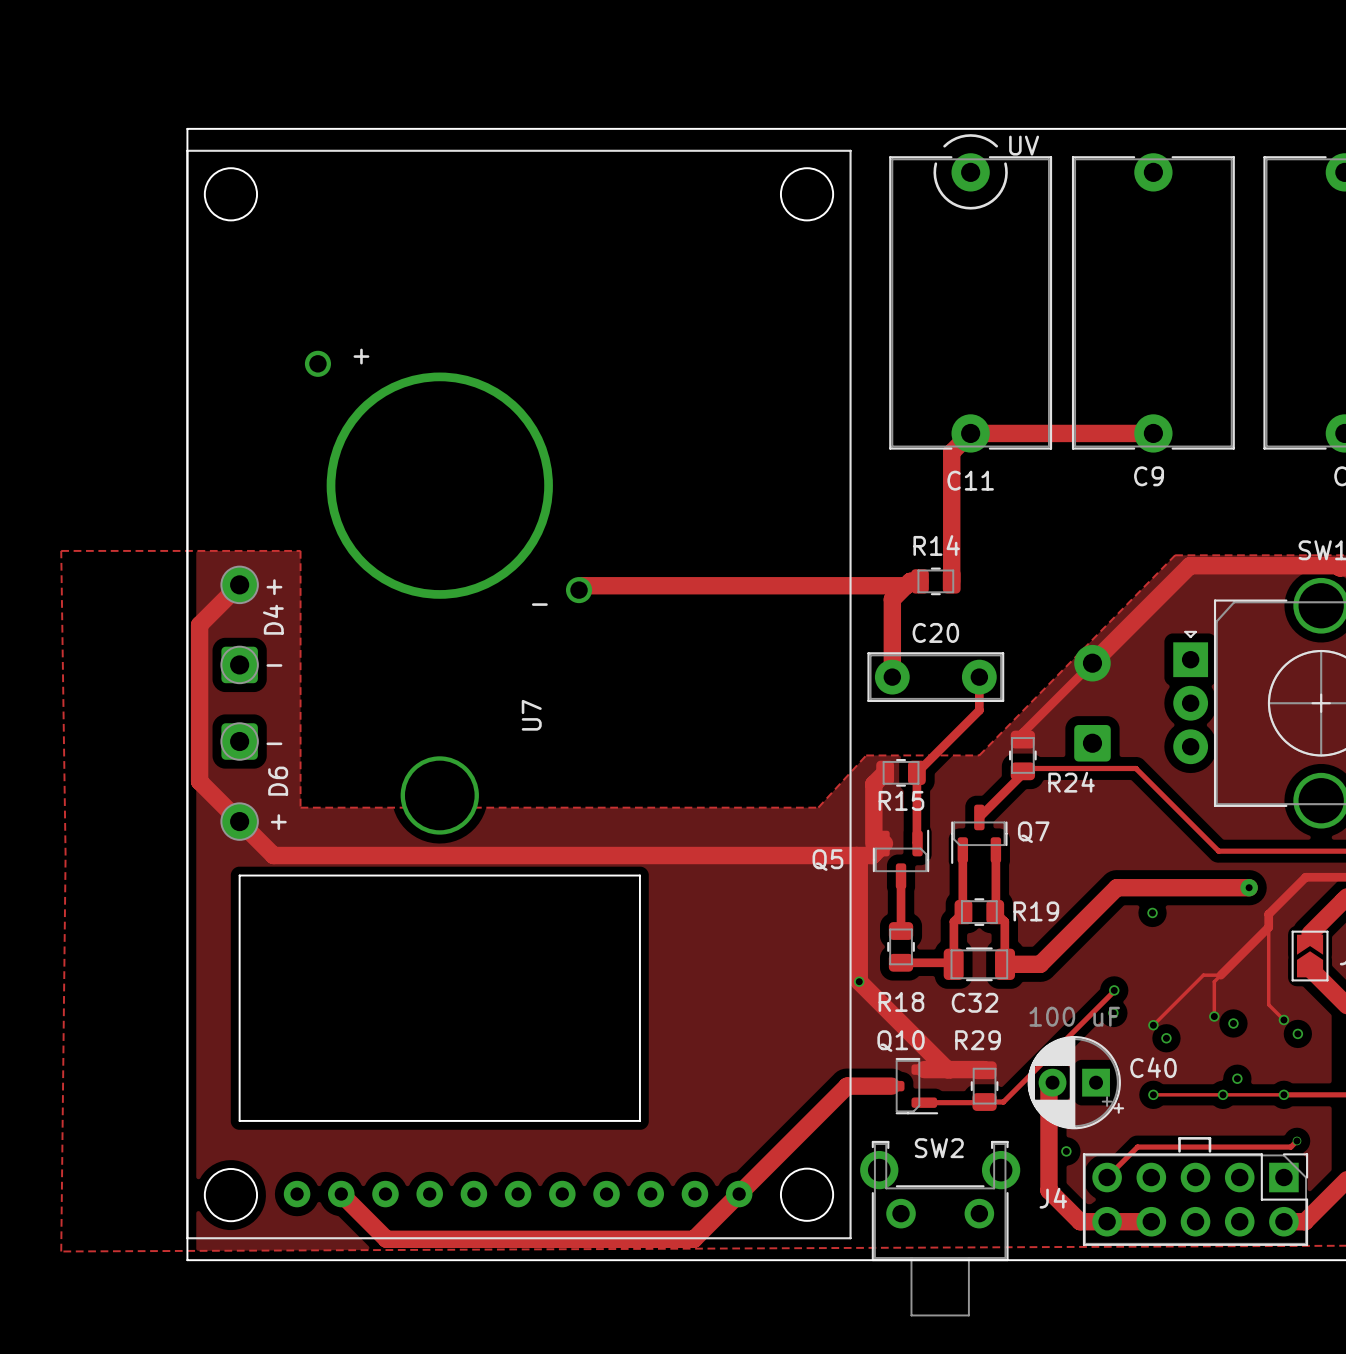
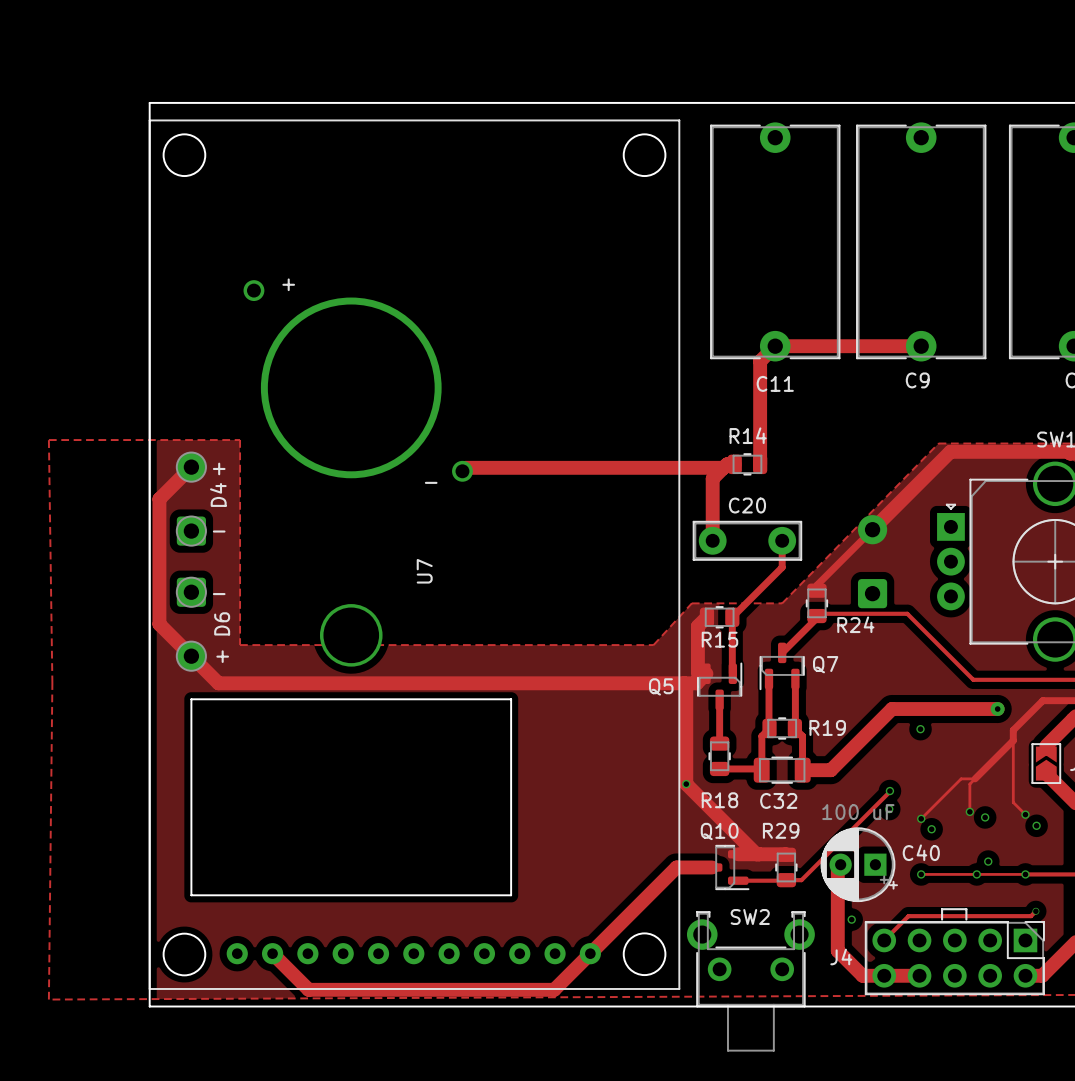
text: UV (1024, 145) -> none
line: (944, 146) (956, 138) (970, 135) (984, 138) (996, 146) -> none
line: (935, 163) (936, 182) (942, 194) (952, 203) (970, 208) (988, 203) (998, 194) (1006, 177) (1005, 163) -> none

